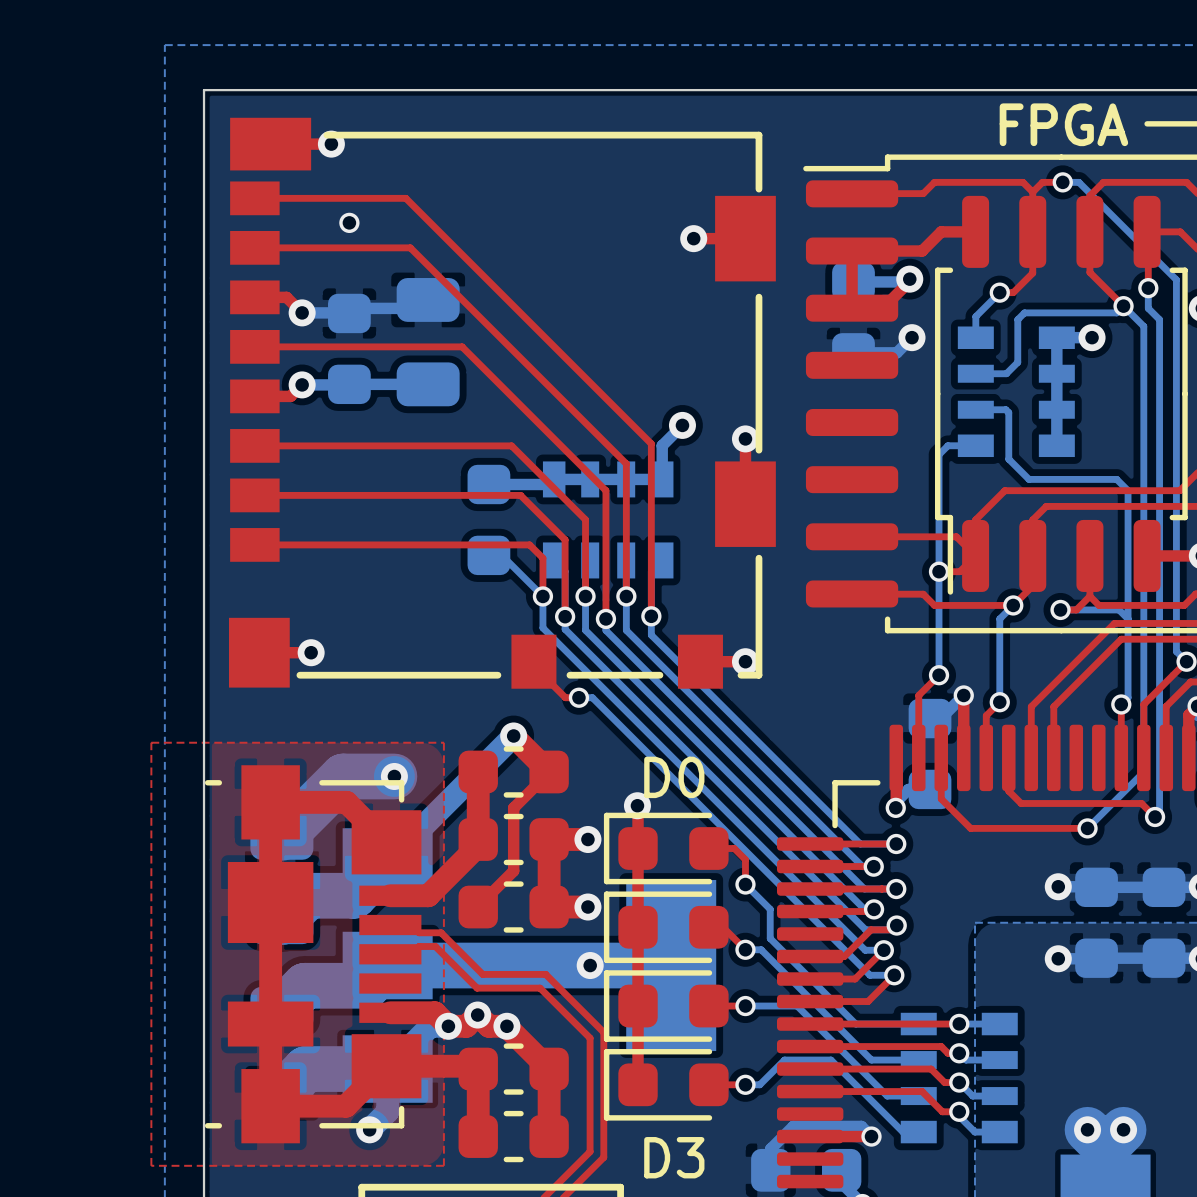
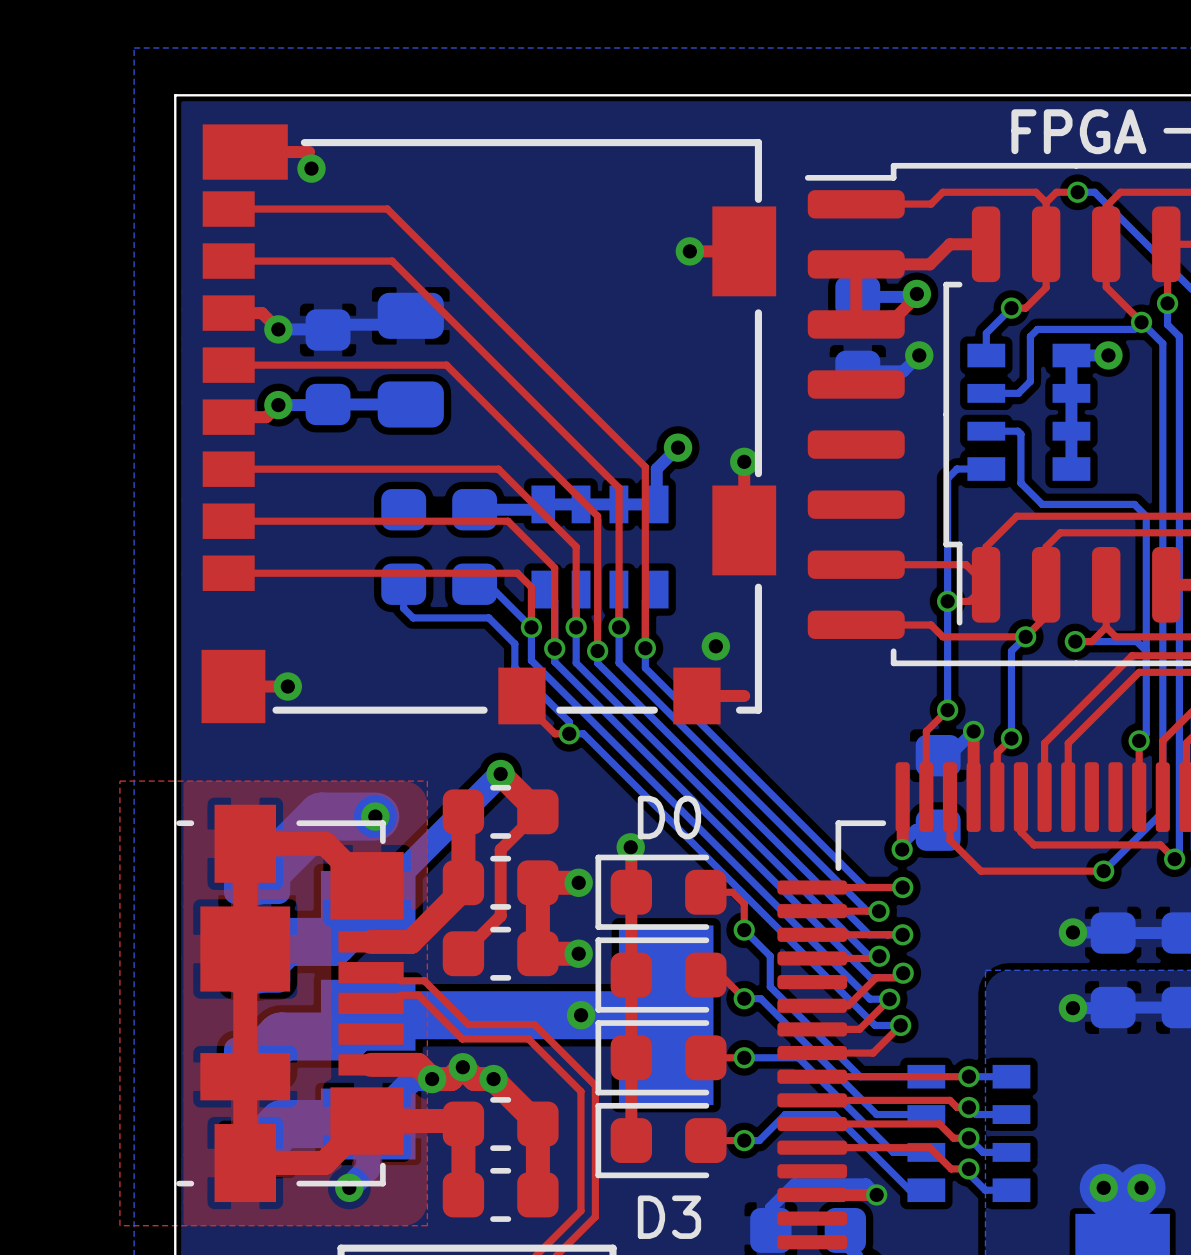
via position: (331, 144) -> (311, 168)
via: (349, 222) -> none
part: none -> (403, 546)
bottom track: none -> (403, 584) (403, 608) (413, 617) (488, 617) (514, 643) (514, 667) (569, 721) (569, 733)
via position: (745, 661) -> (715, 646)

